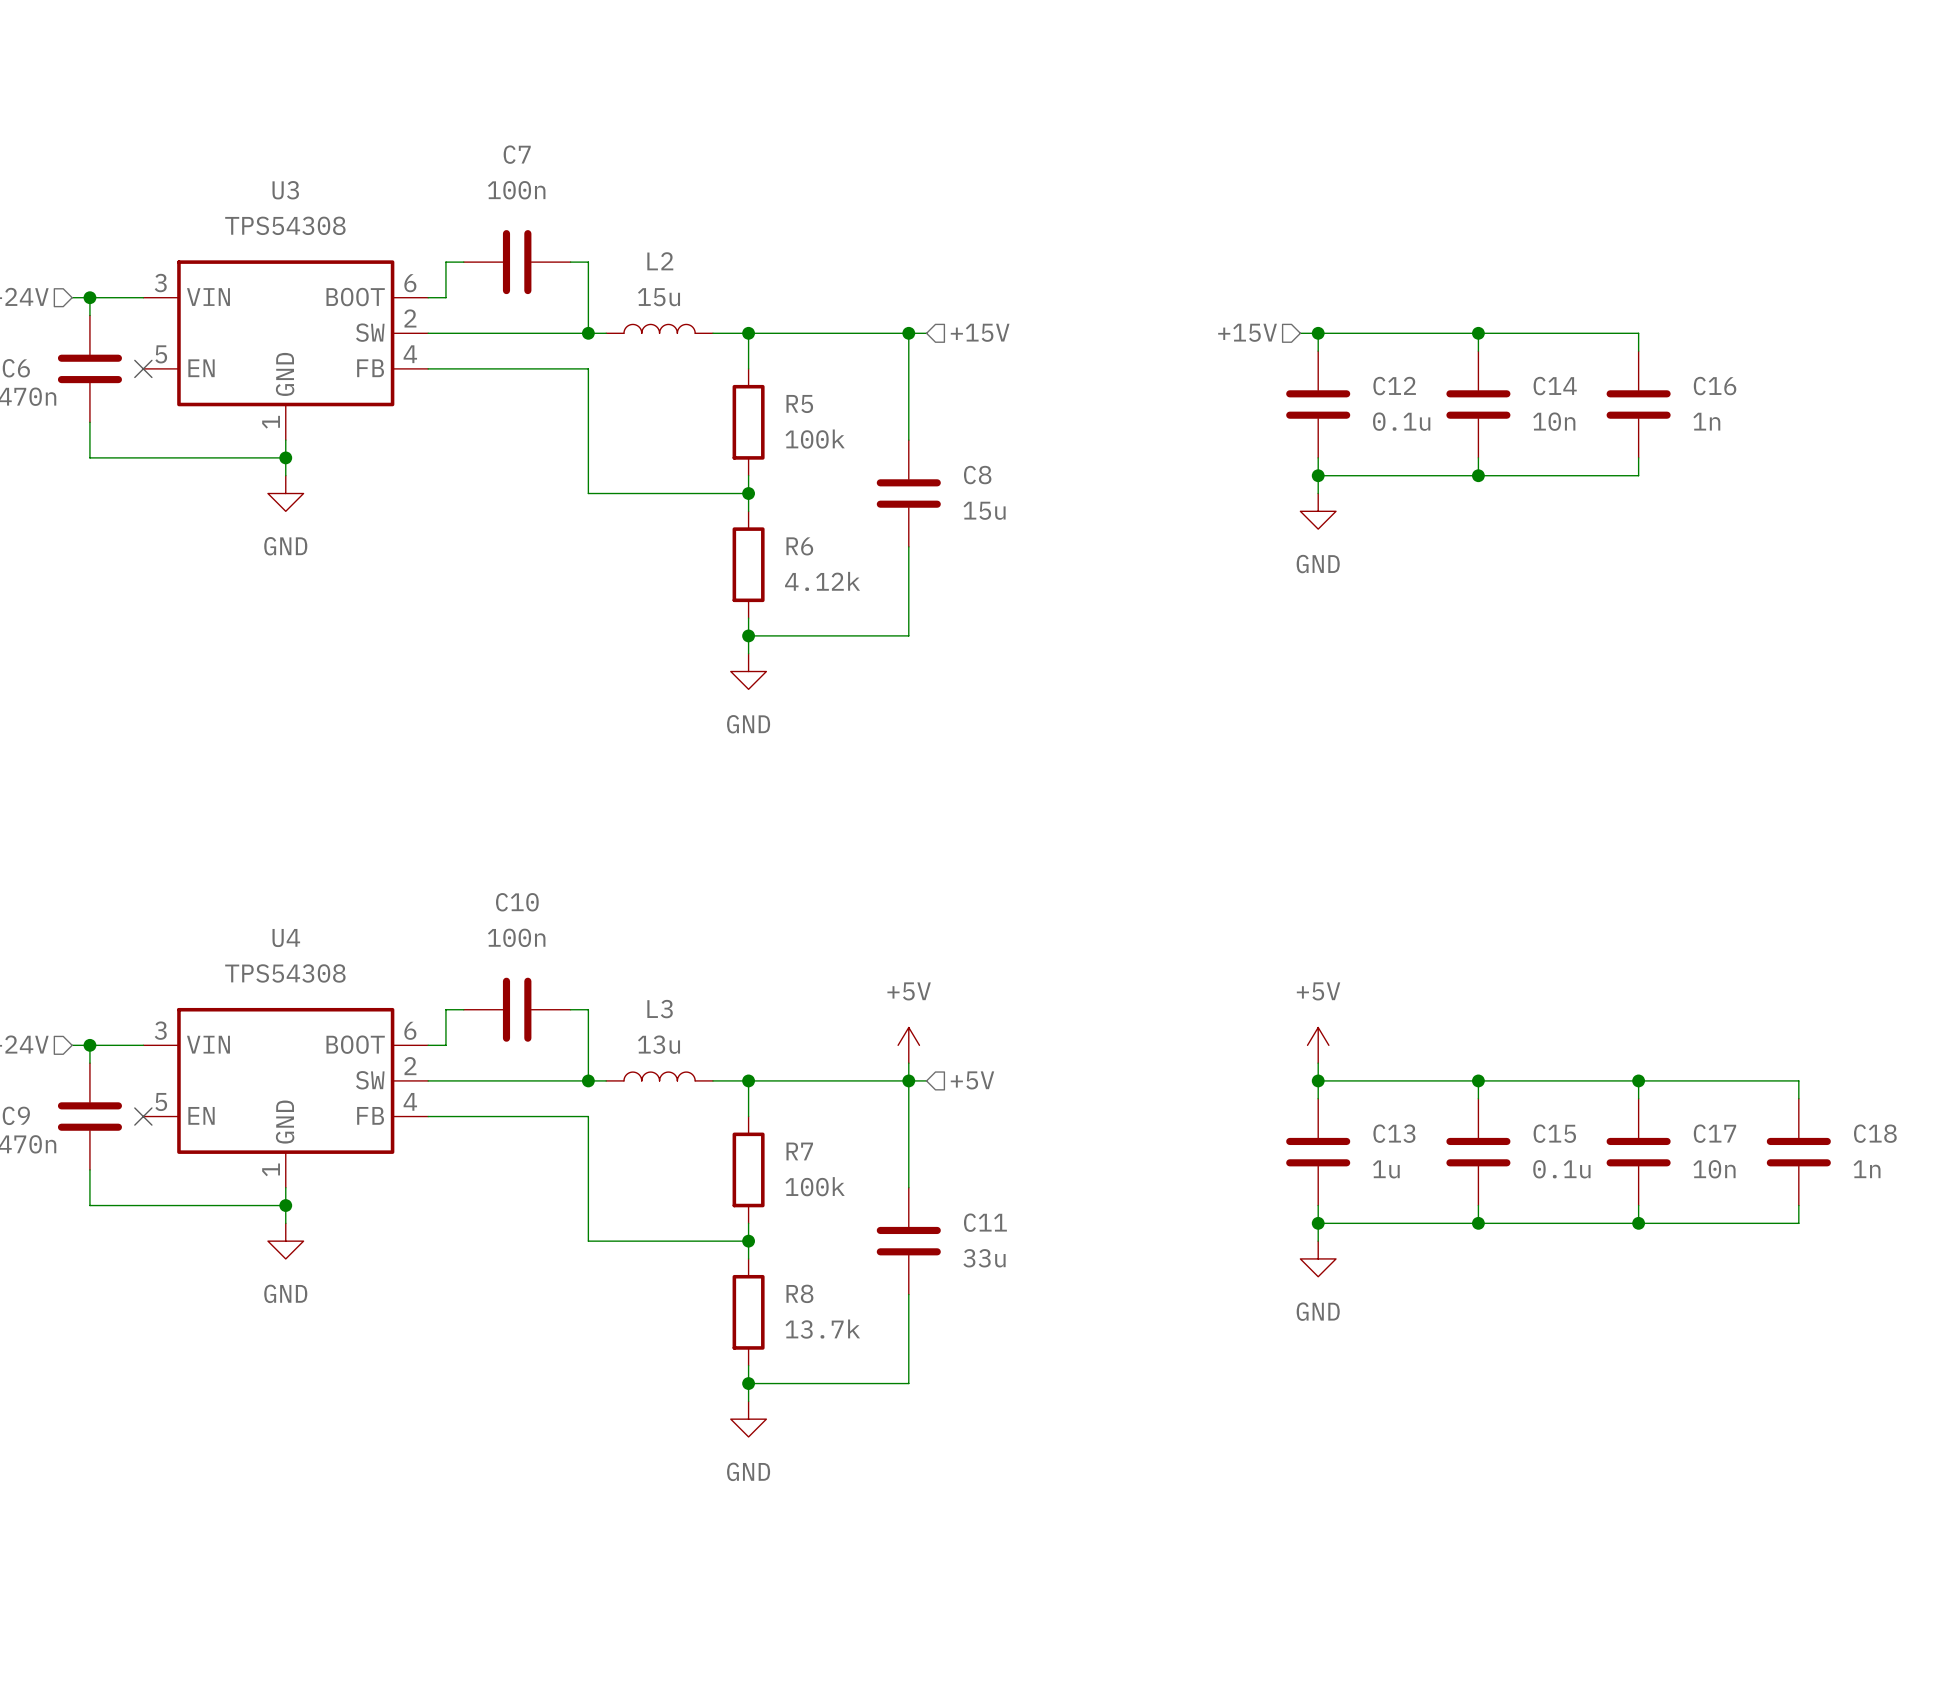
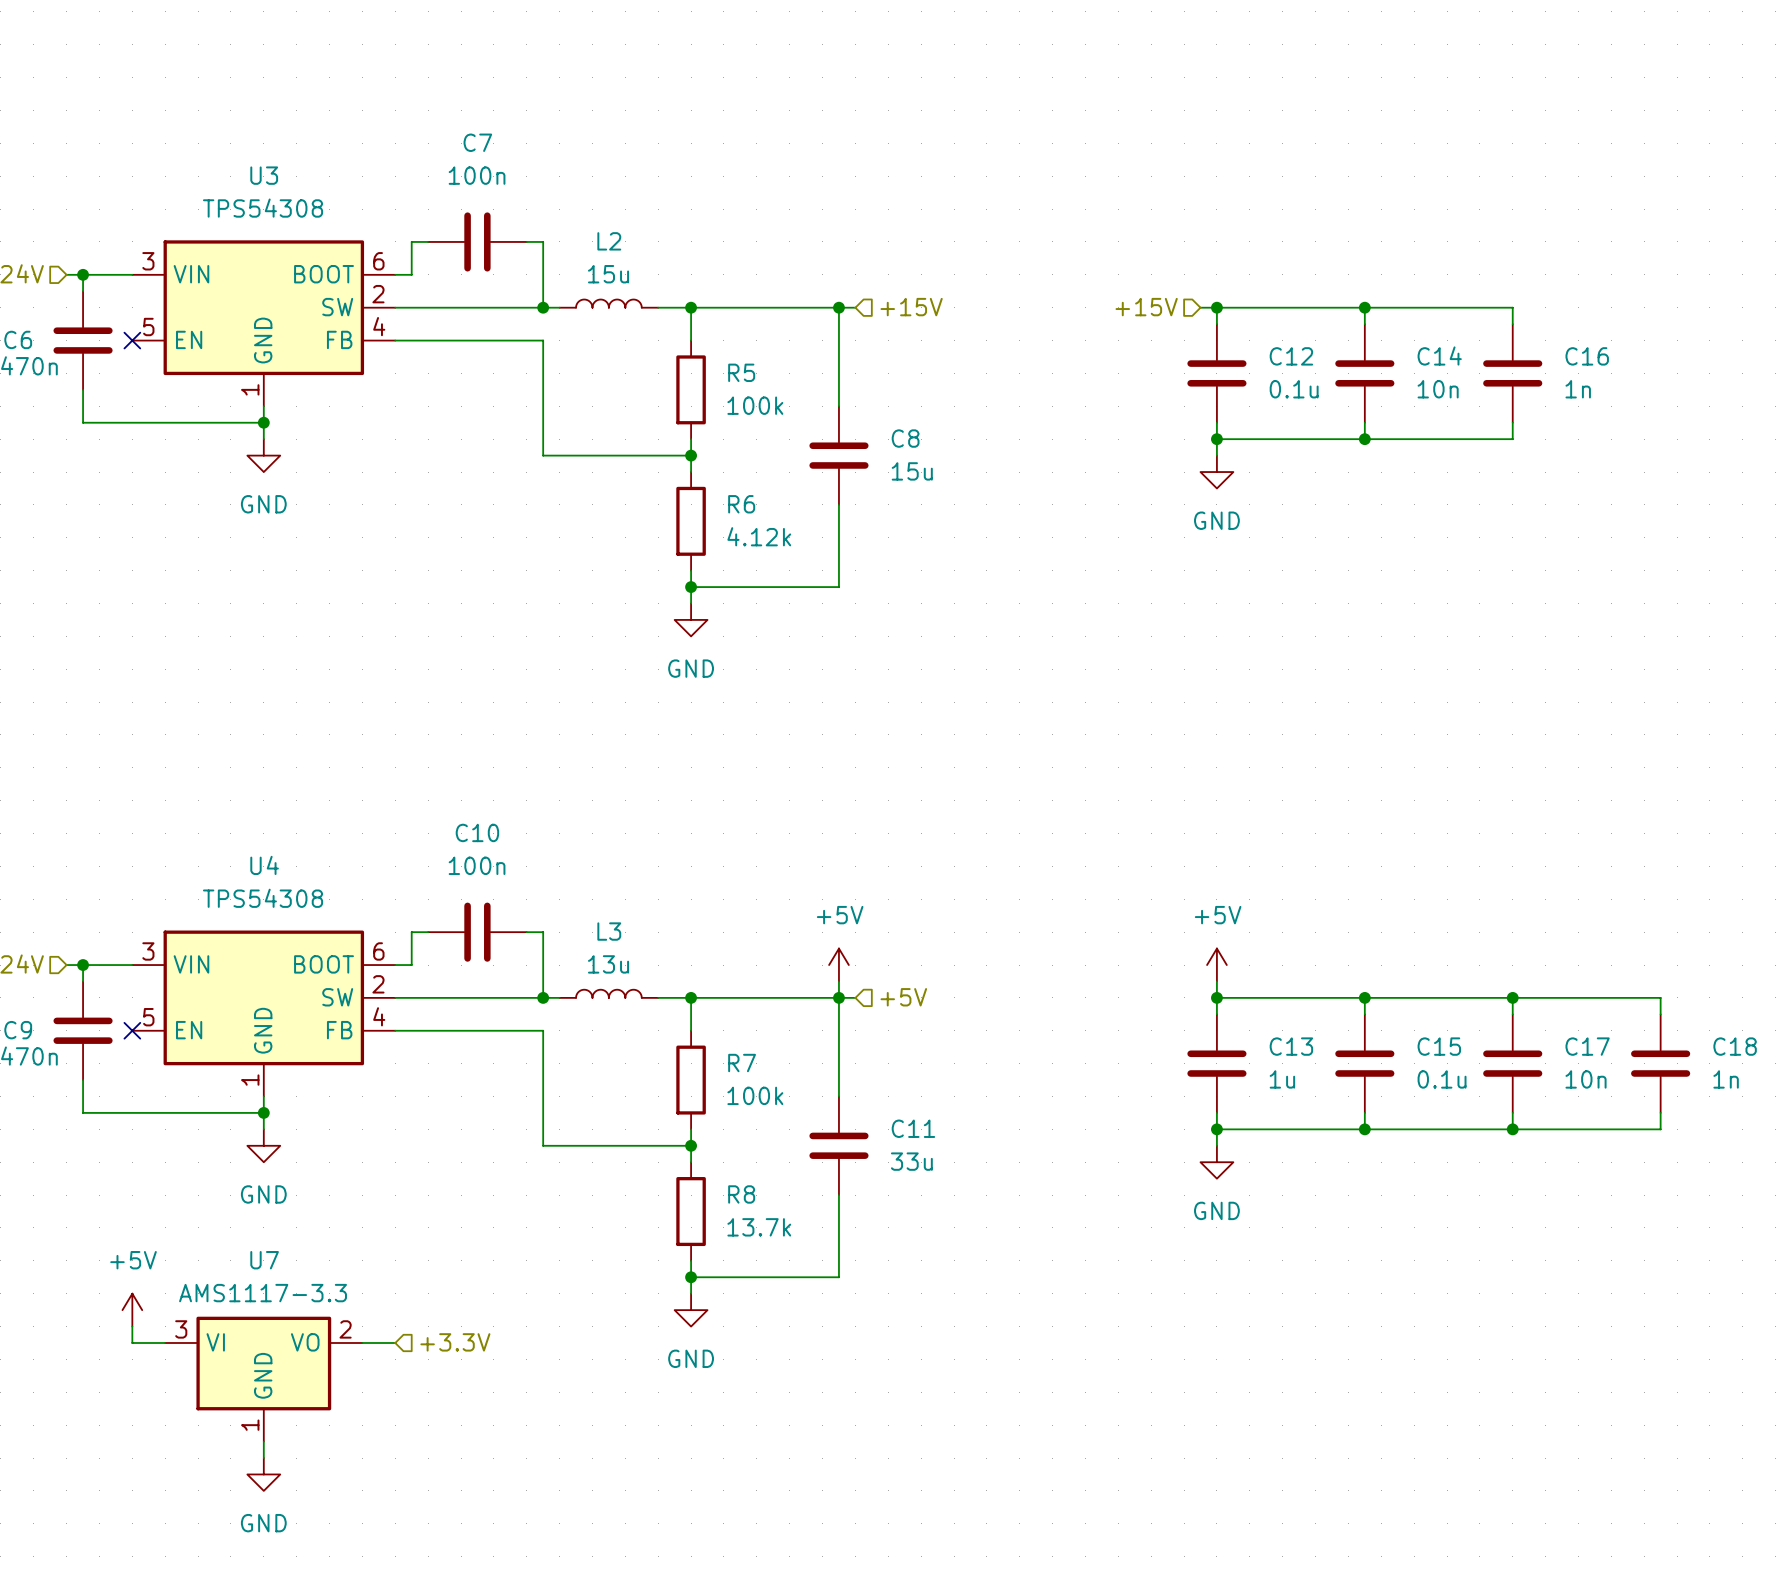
power symbol: none -> +5V (132, 1310)
wire: none -> (132, 1326) (132, 1342) (165, 1342)
wire: none -> (362, 1342) (395, 1342)
hierarchical label: none -> +3.3V (455, 1342)
U7: none -> AMS1117-3.3 (263, 1379)
wire: none -> (263, 1441) (263, 1458)
power symbol: none -> GND (263, 1474)

